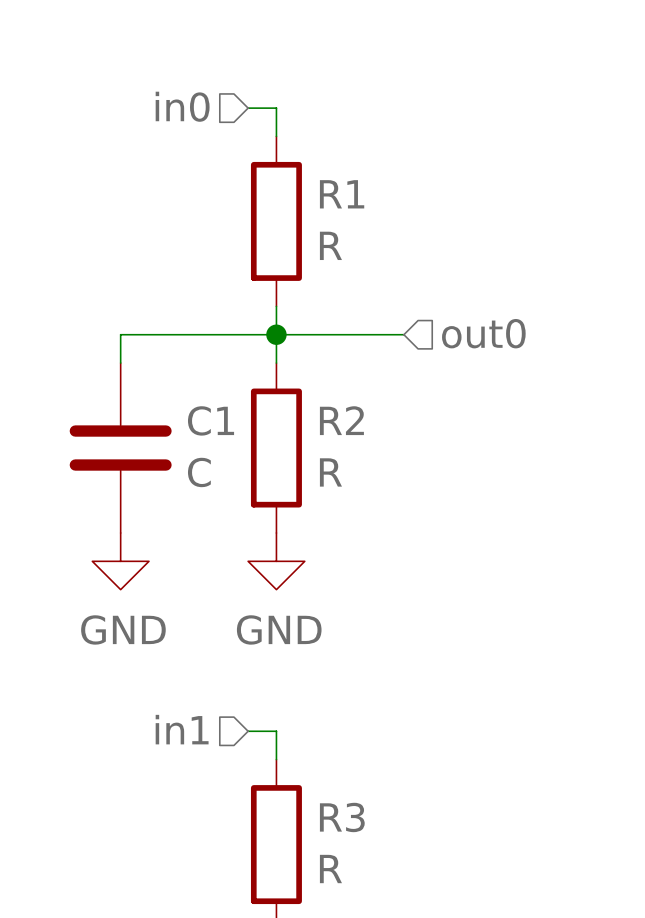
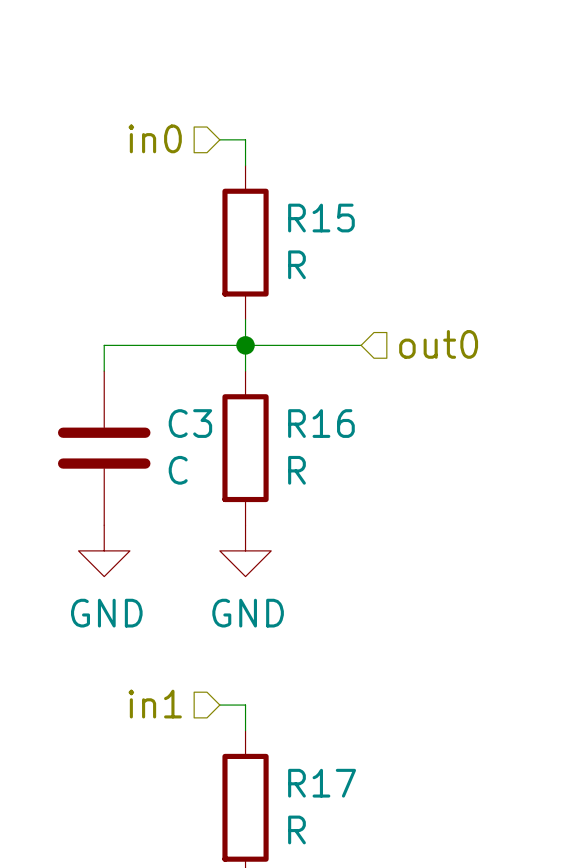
R1 name: R1 (342, 194) -> R15 (321, 218)
C1 name: C1 (211, 420) -> C3 (190, 423)
R2 name: R2 (341, 420) -> R16 (321, 423)
R3 name: R3 (342, 817) -> R17 (322, 783)

